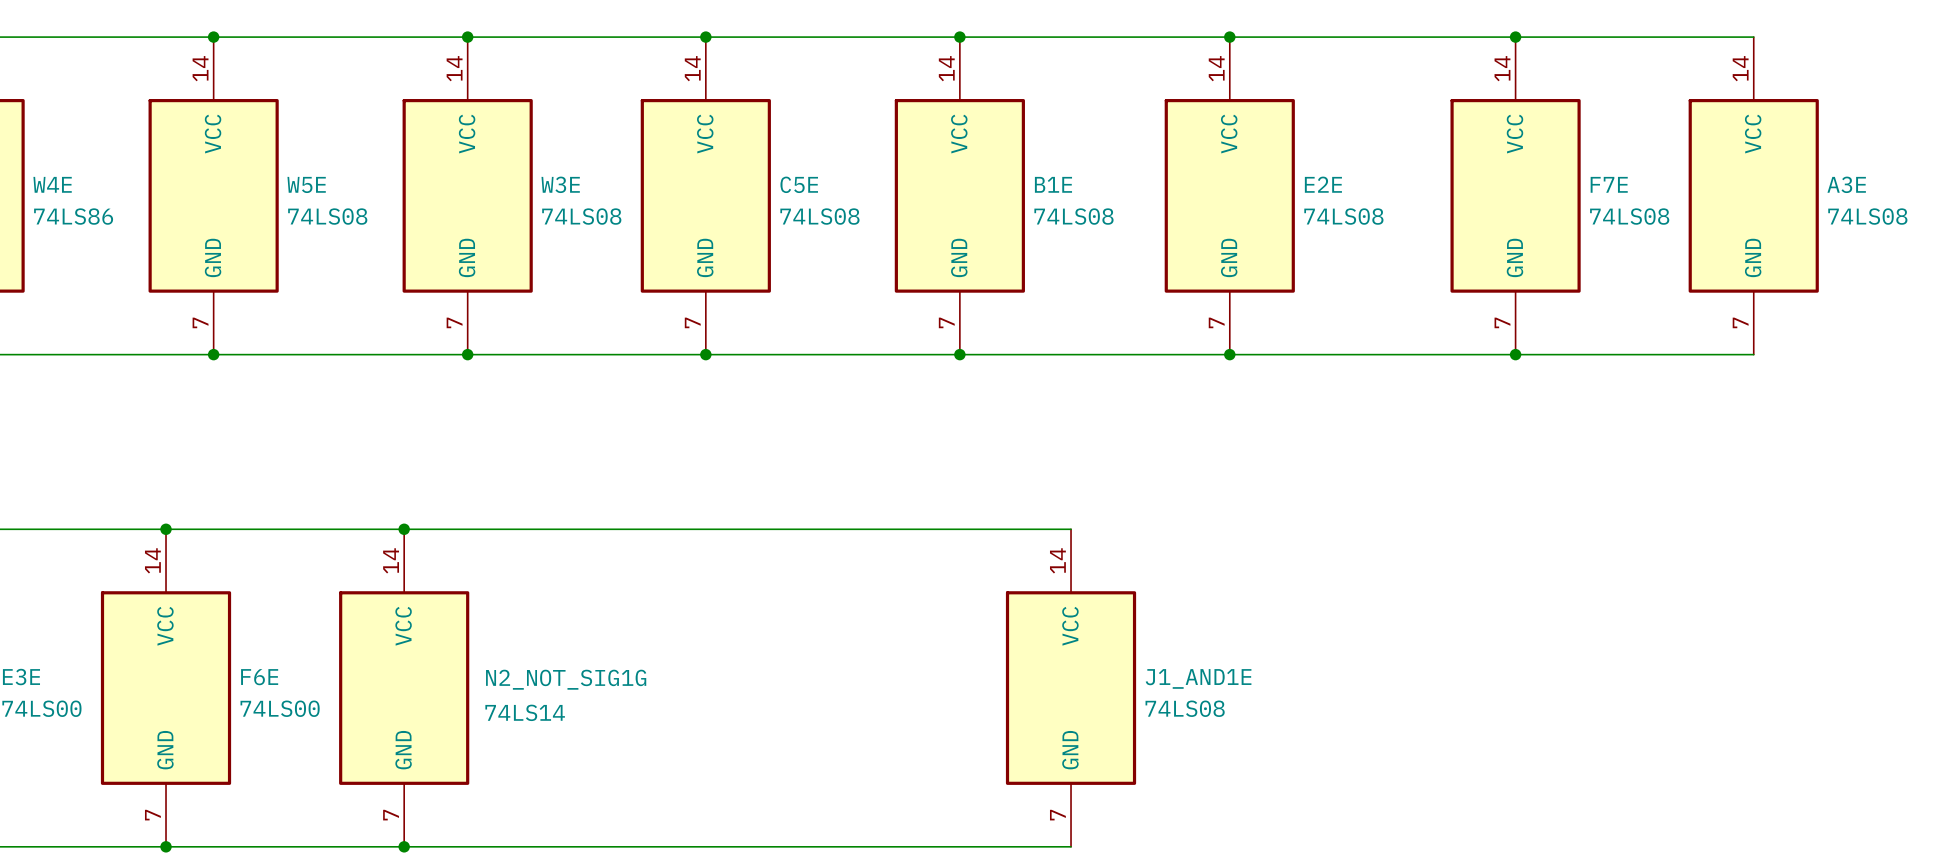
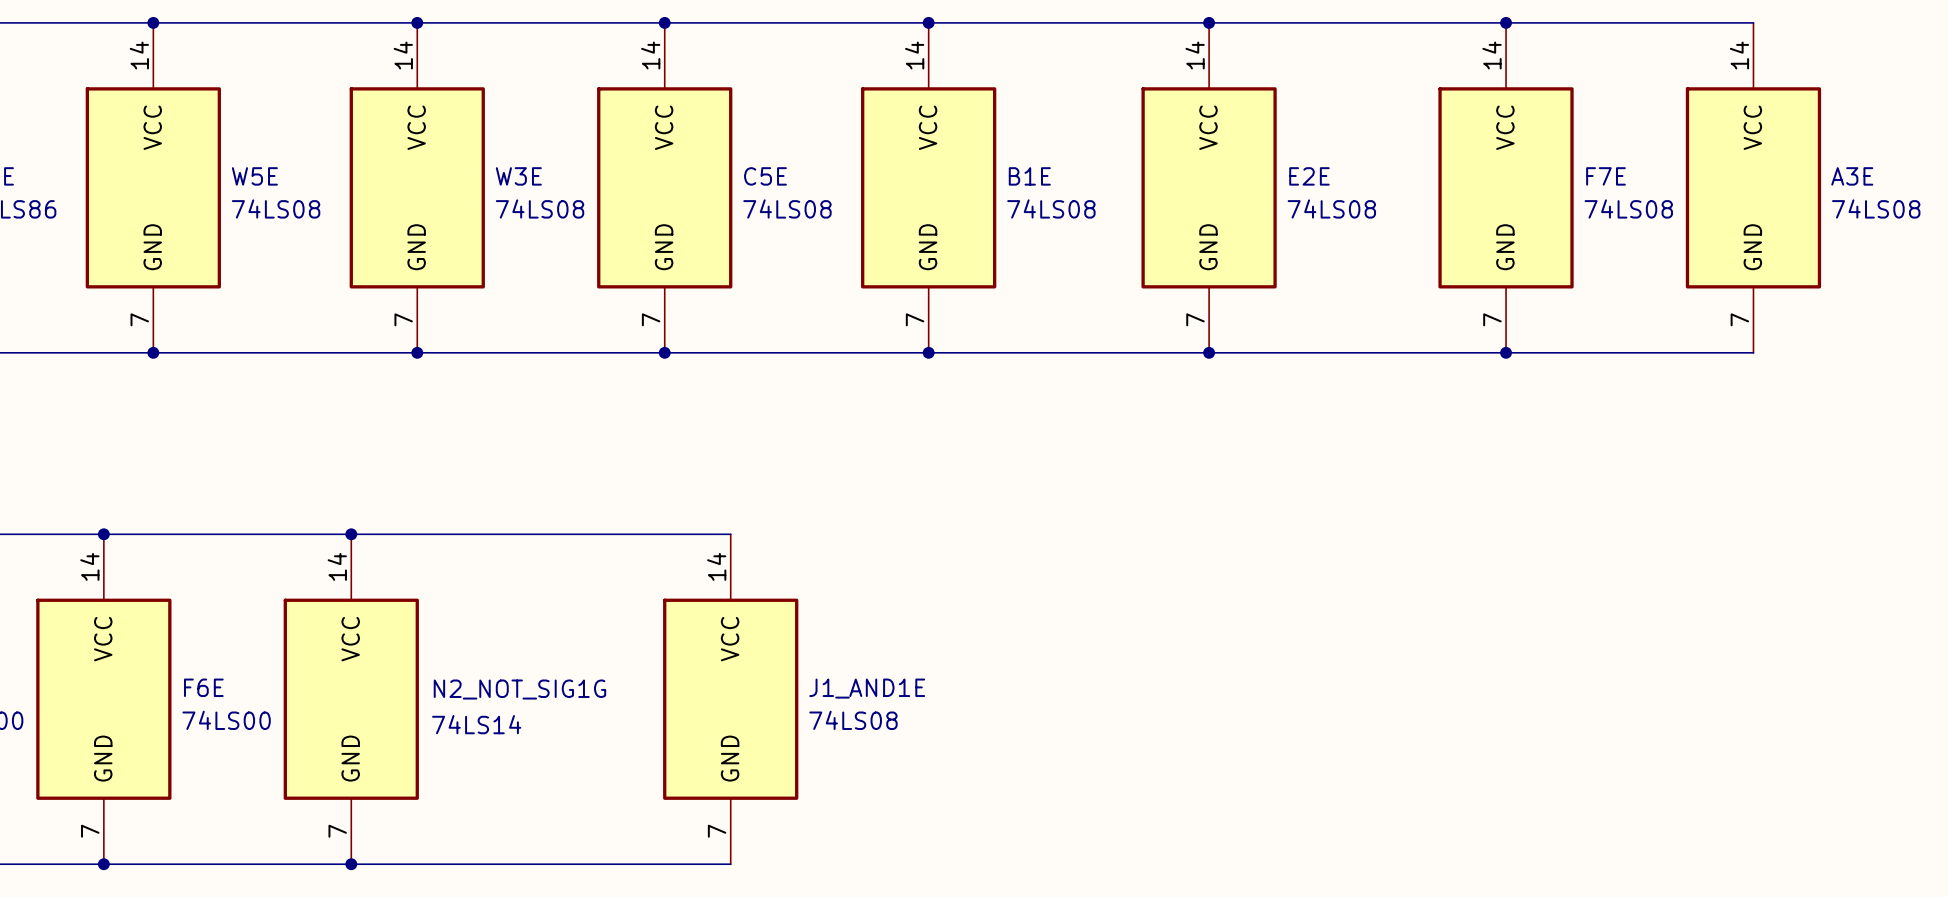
wire: (769, 529) (1071, 529) -> none
J1_AND1E position: (1071, 688) -> (730, 699)
wire: (769, 846) (1071, 846) -> none

